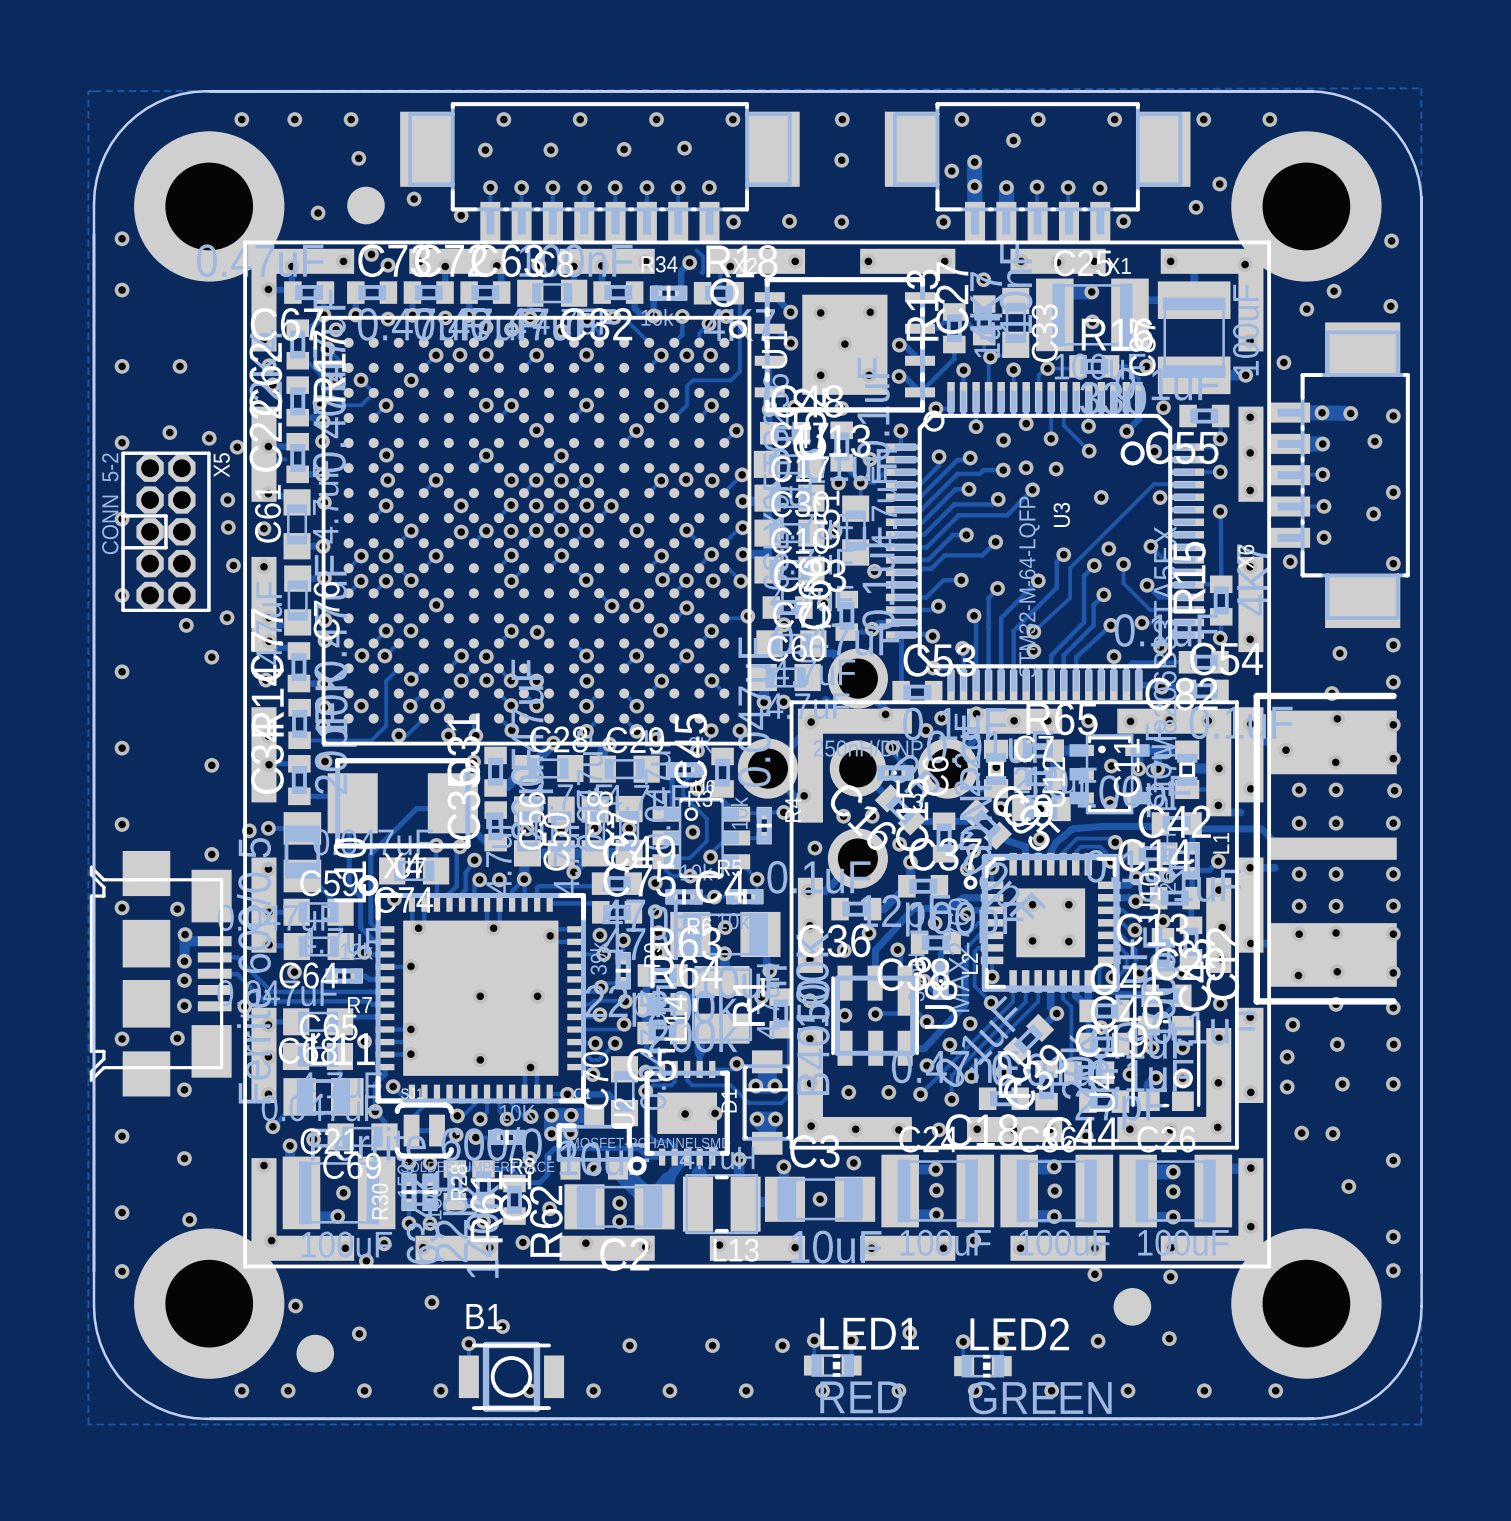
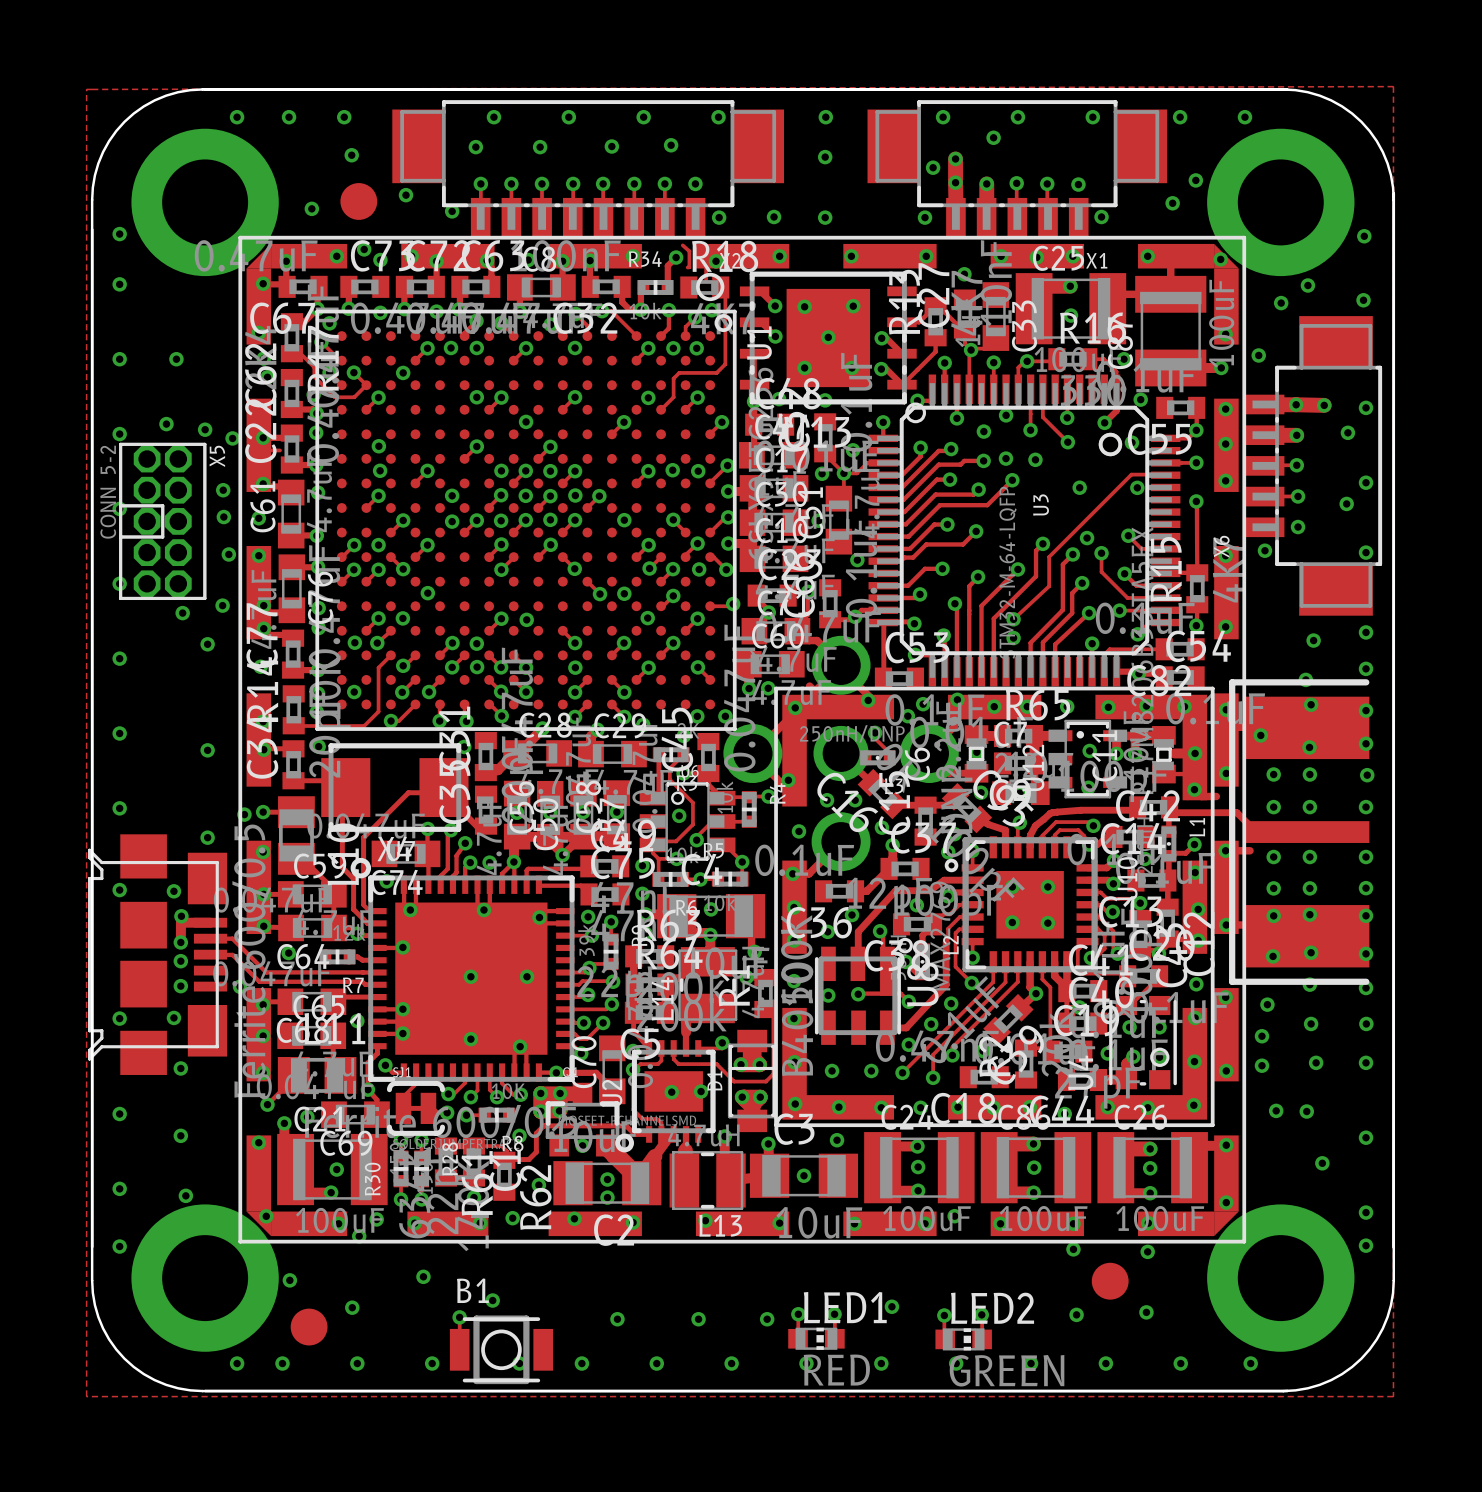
part footprint: [243, 240, 1272, 1269] -> [238, 235, 1247, 1244]

